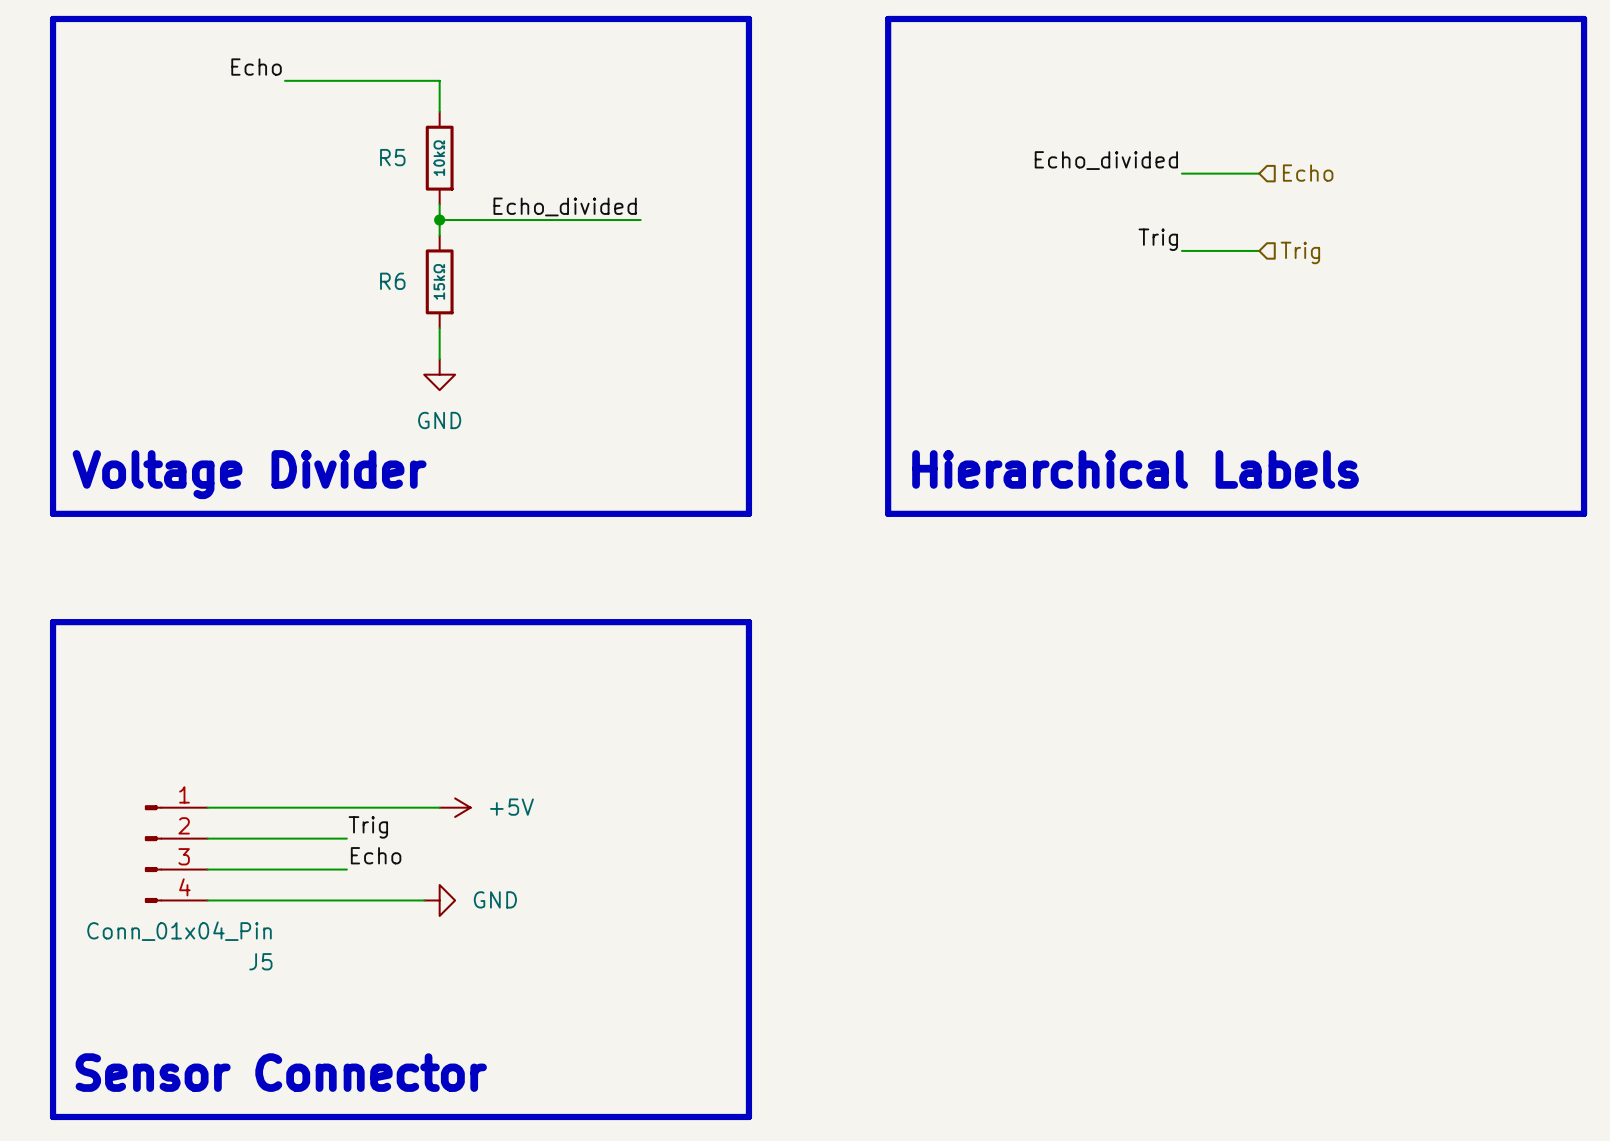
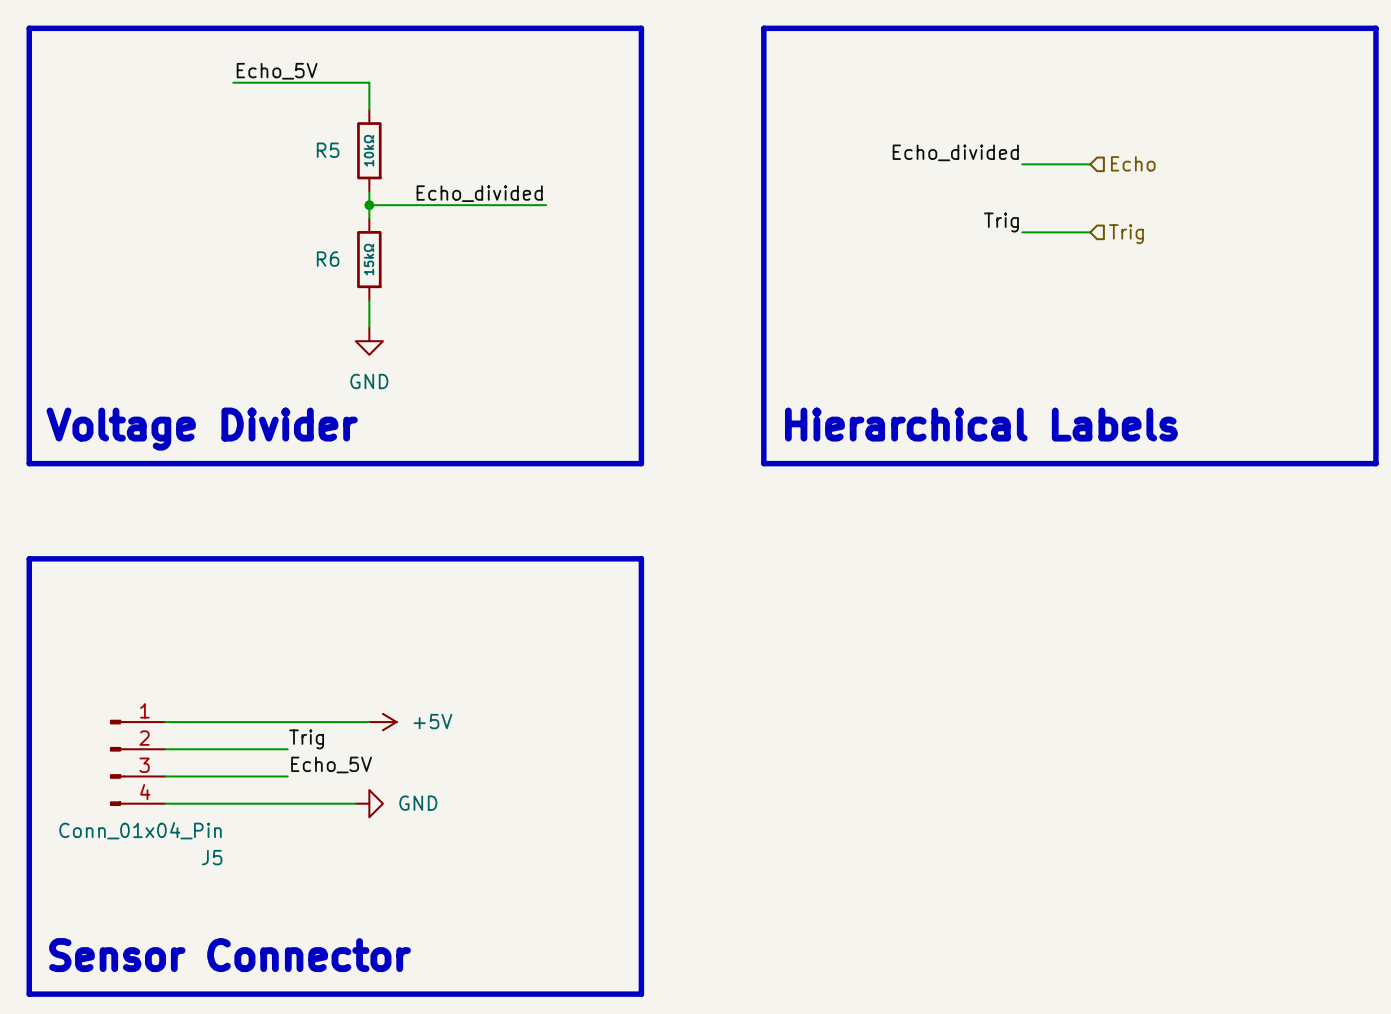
label: Echo (256, 67) -> Echo_5V (277, 71)
label: Echo (376, 855) -> Echo_5V (331, 764)

